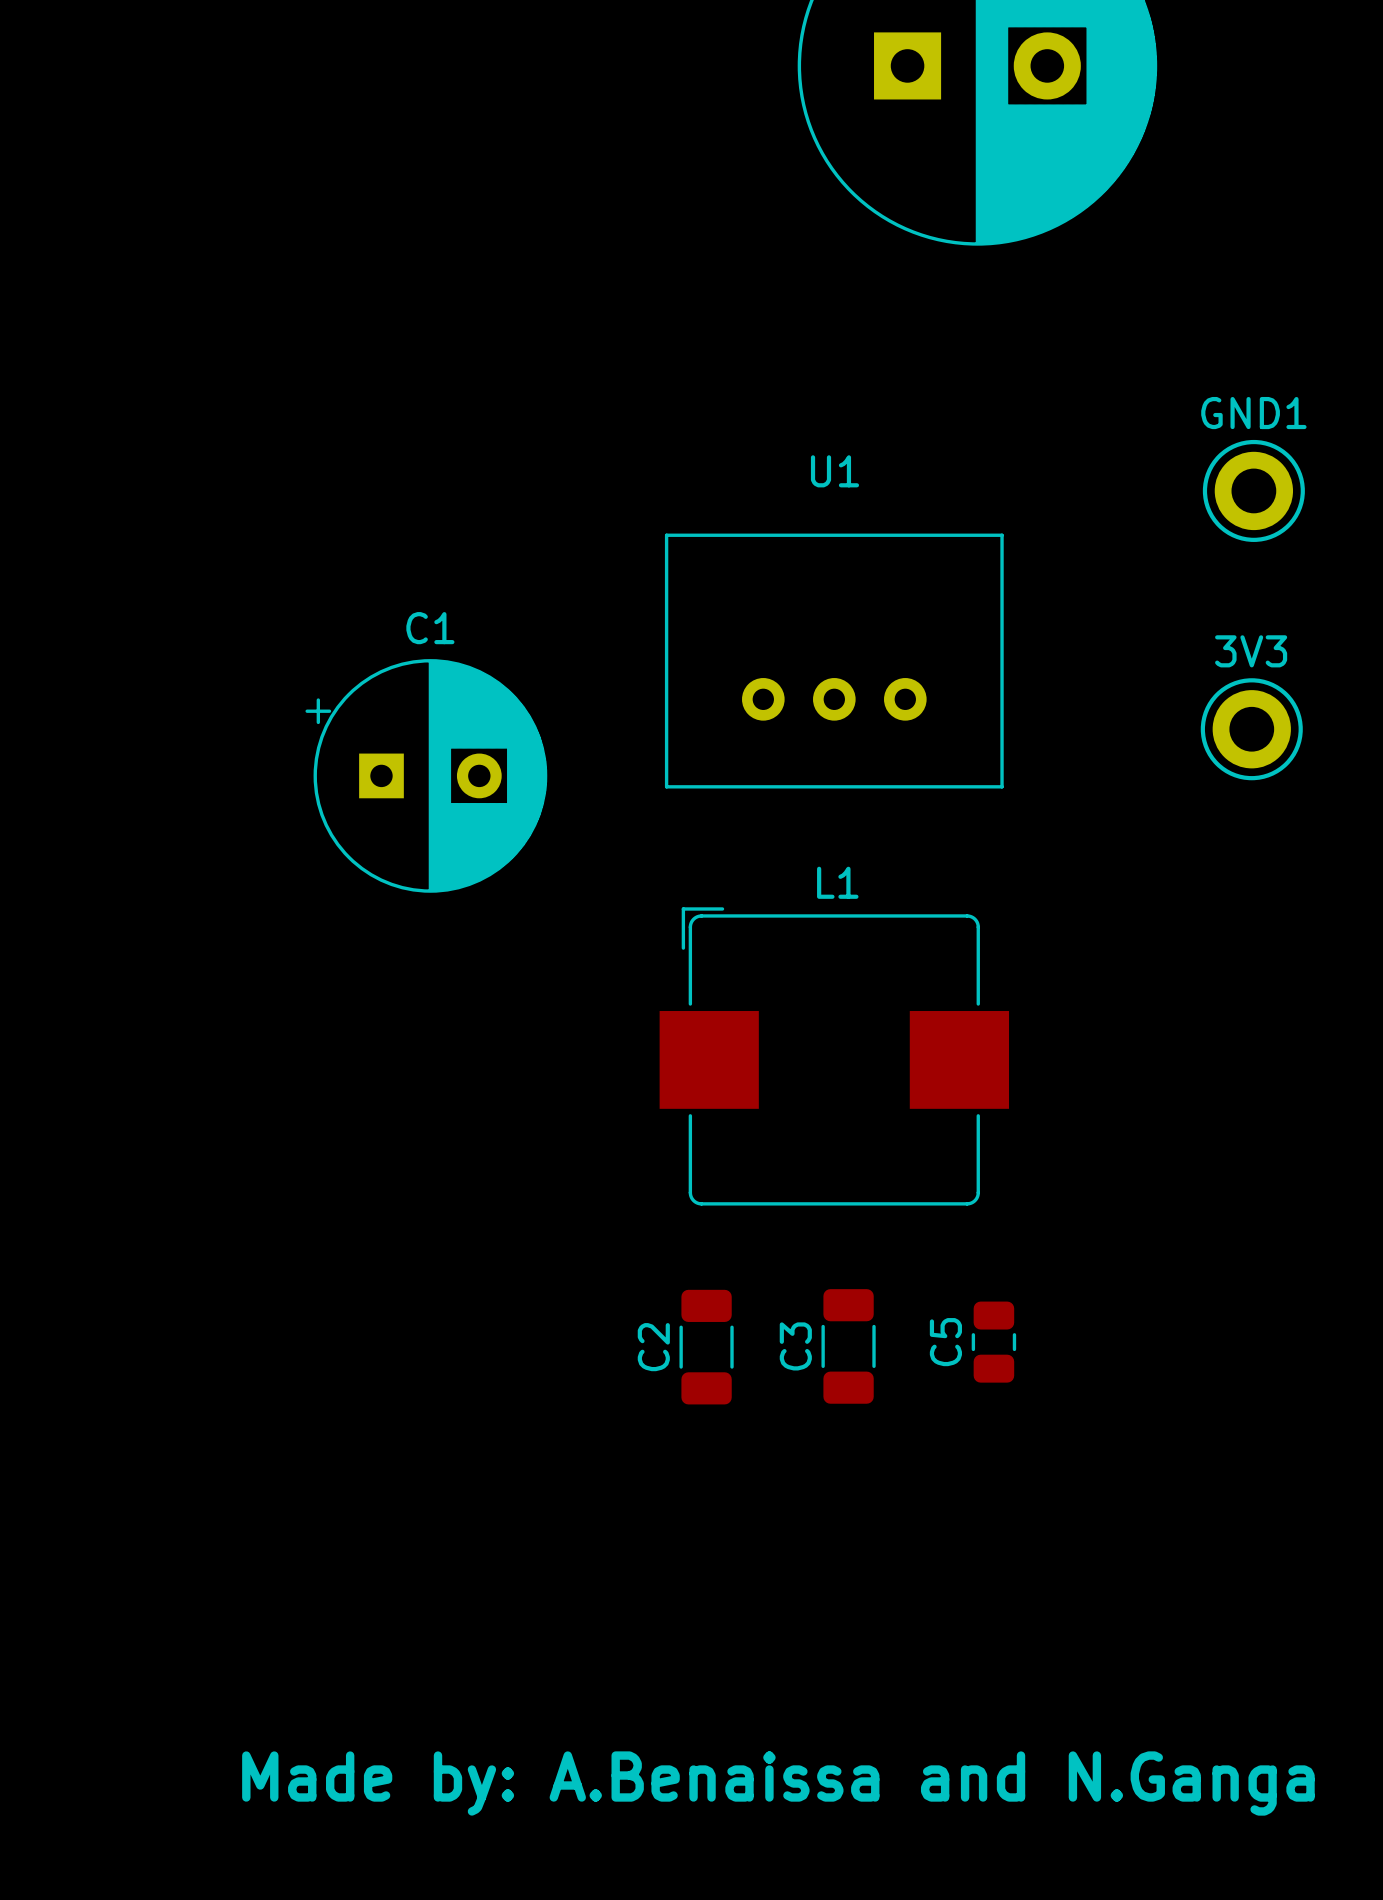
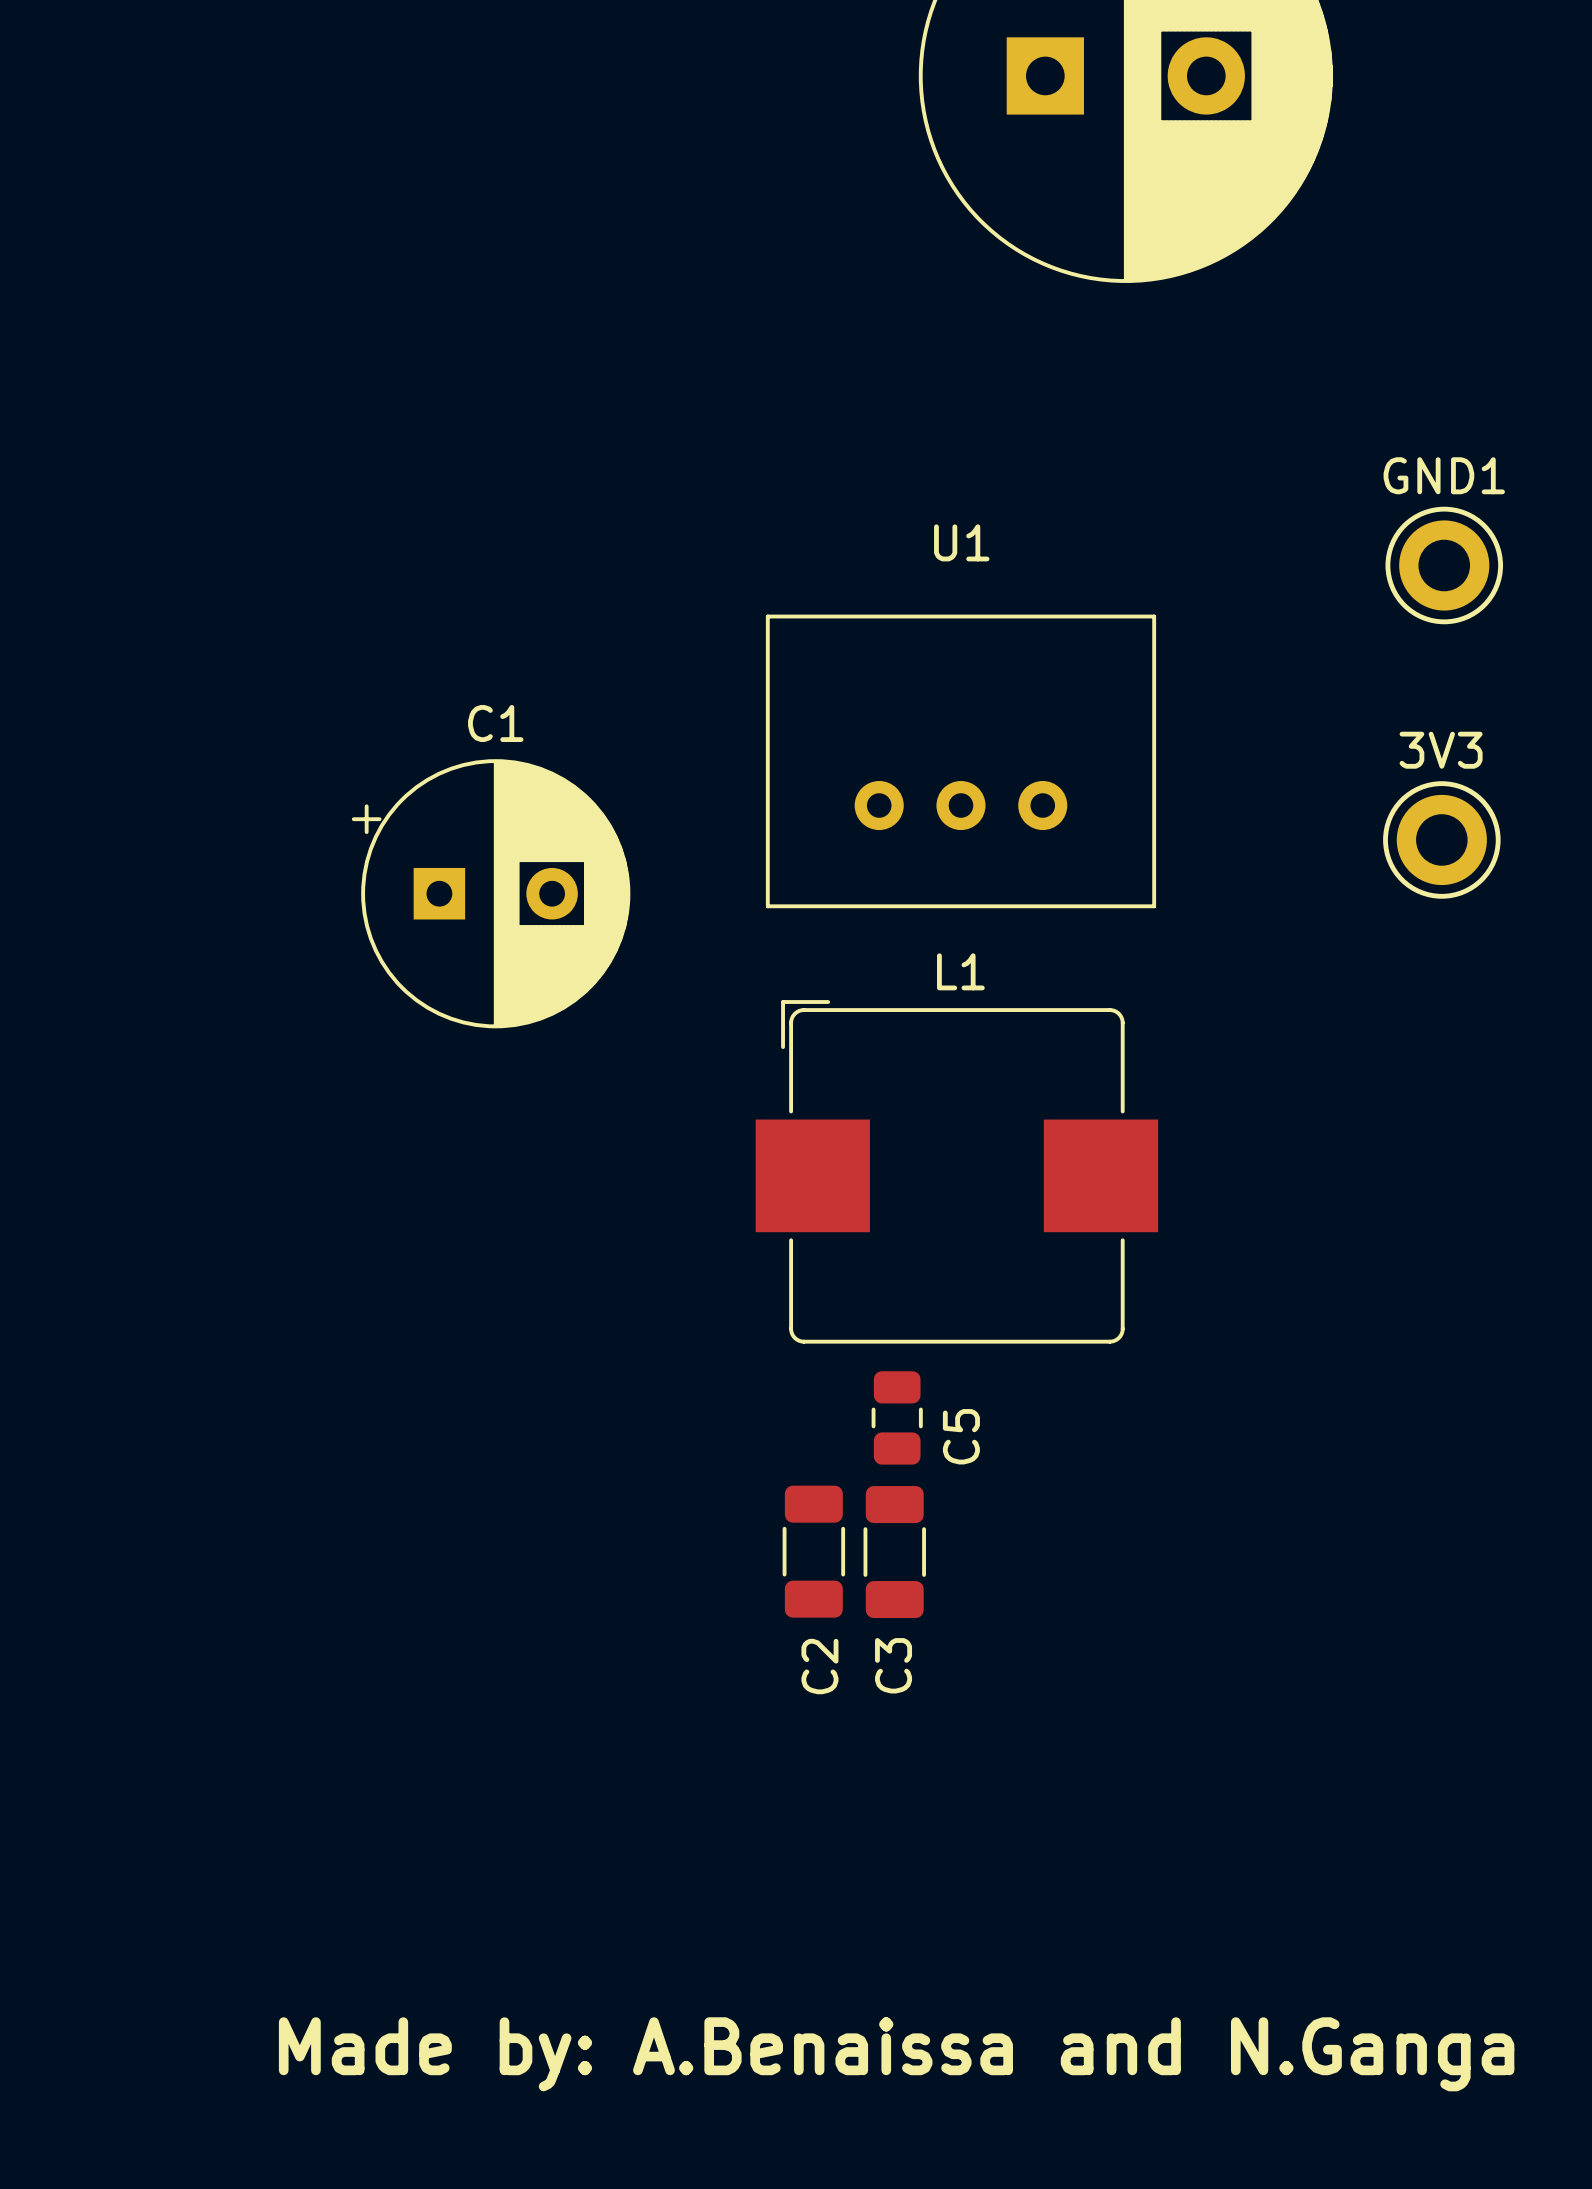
L1 position: (834, 1056) -> (956, 1171)
C5 name position: C5 (945, 1342) -> C5 (961, 1436)
C5 position: (993, 1342) -> (897, 1417)
C3 name position: C3 (795, 1346) -> C3 (893, 1665)
C3 position: (848, 1346) -> (894, 1552)
C2 name position: C2 (653, 1347) -> C2 (819, 1666)

